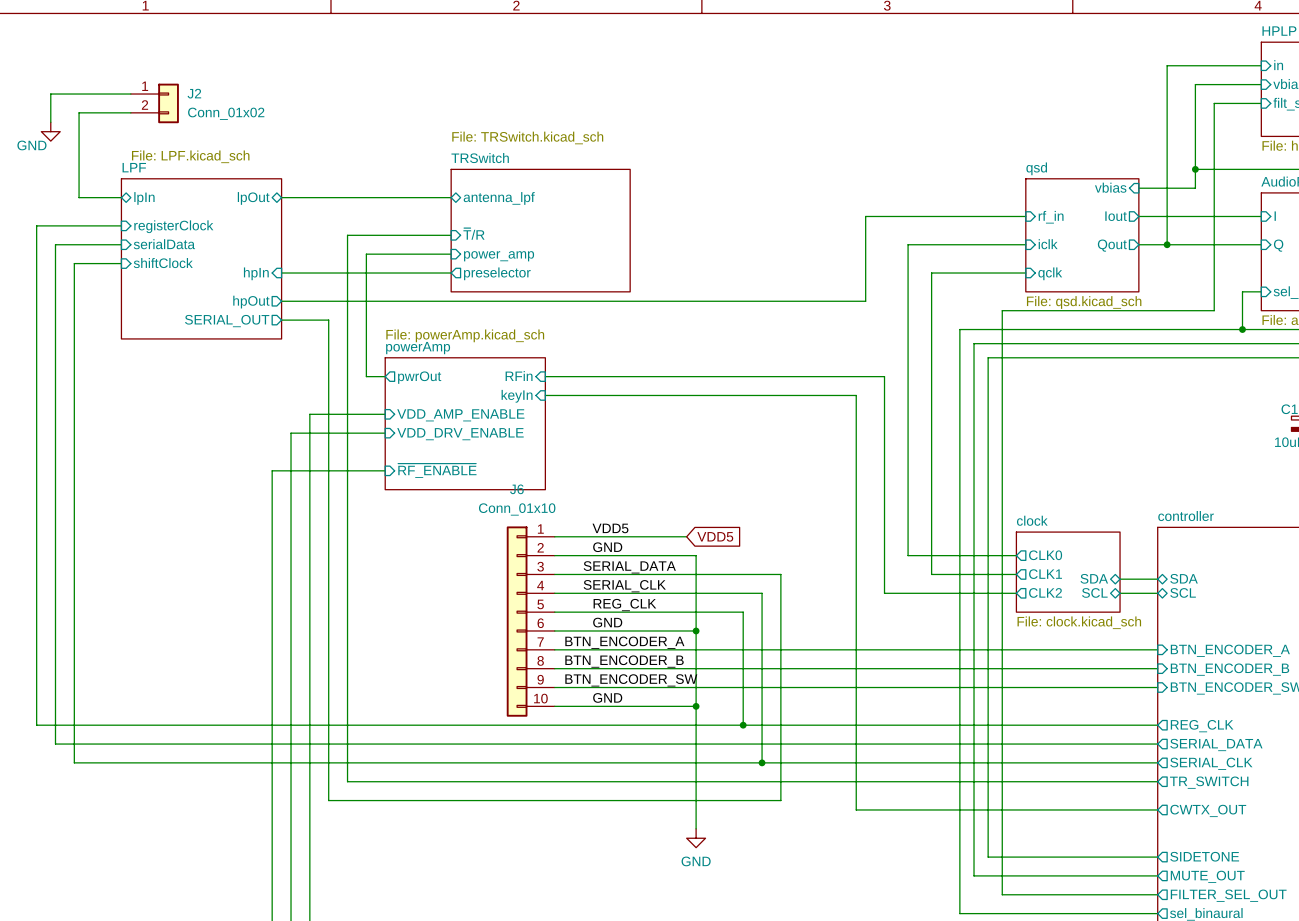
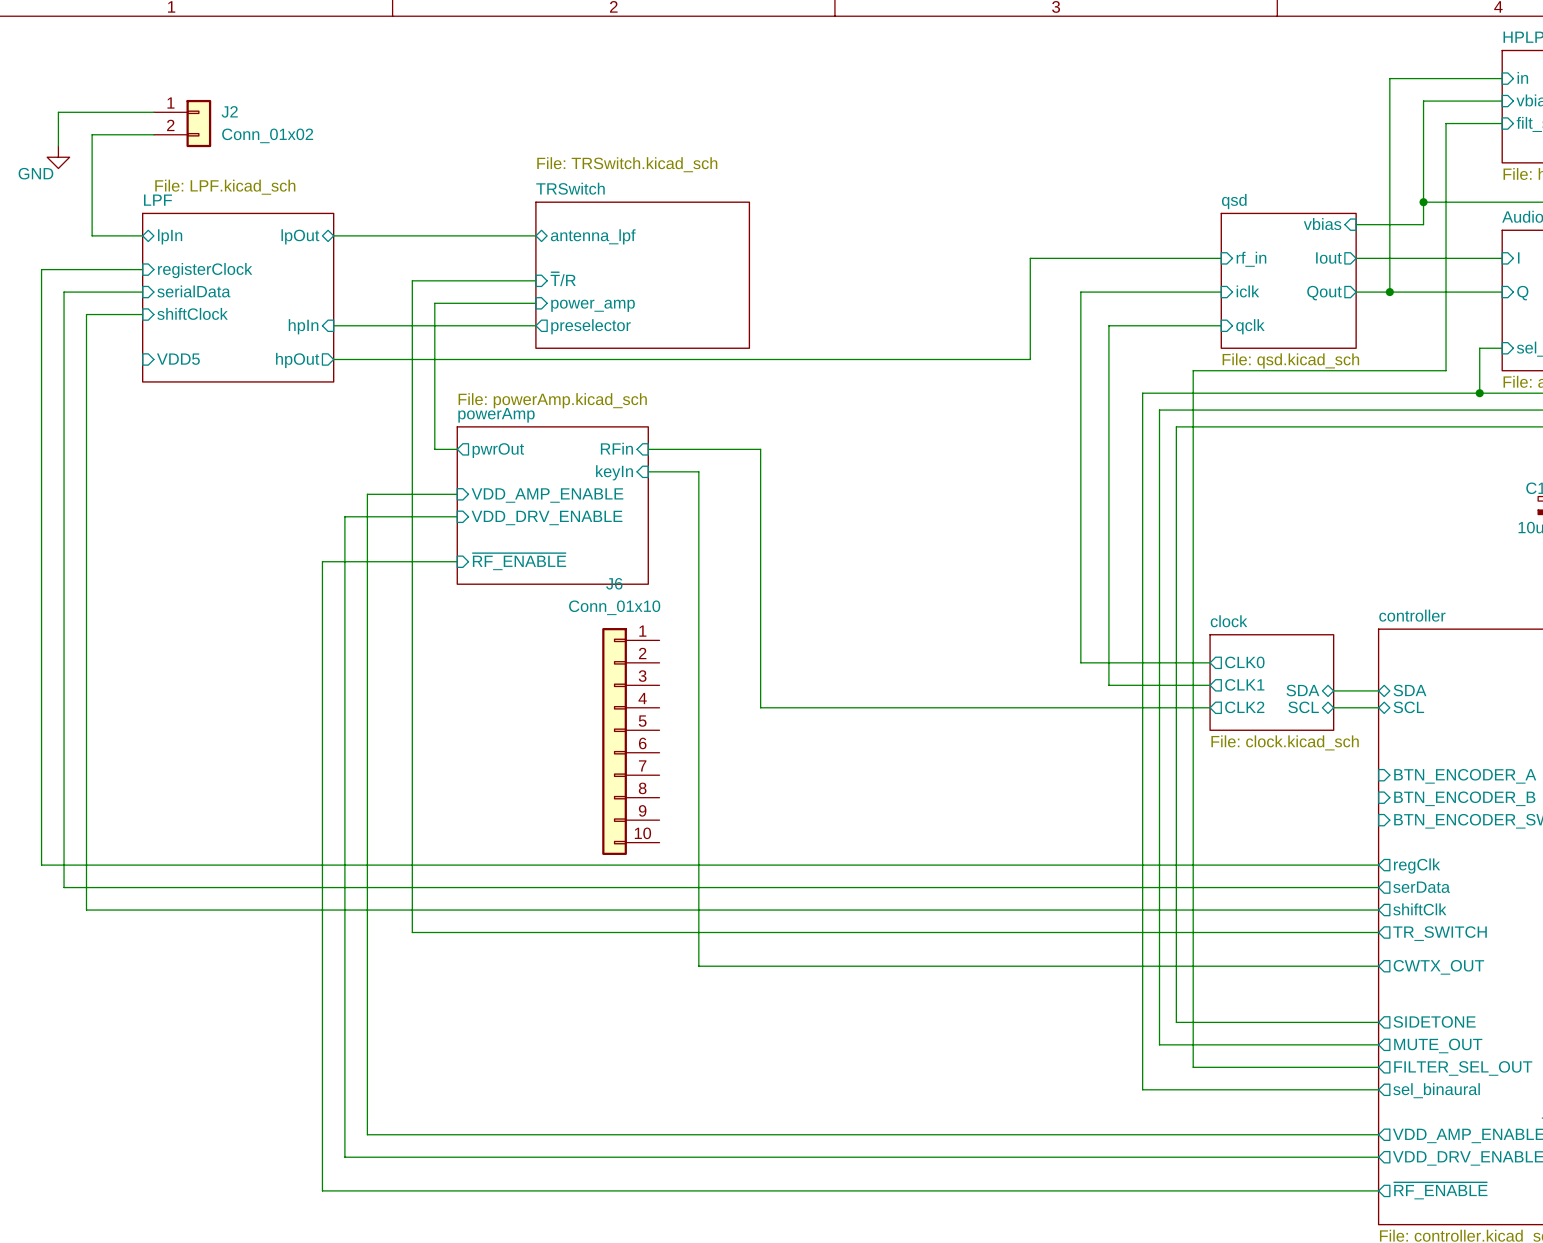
sheet LPF: none -> File: LPF.kicad_sch (238, 297)
sheet LPF: File: LPF.kicad_sch (201, 258) -> none
sheet pin: none -> VDD5 (178, 359)
wire: (281, 320) (328, 320) (328, 800) (780, 800) (780, 574) (554, 574) -> none
sheet pin: SERIAL_OUT (227, 321) -> none
wire: (639, 376) (884, 376) (884, 593) -> none
wire: (587, 395) (856, 395) (856, 809) -> (698, 471) (698, 966) (1019, 966)
label: VDD5 (610, 528) -> none
wire: (554, 536) (686, 536) -> none
global label: VDD5 (715, 536) -> none
label: GND (607, 547) -> none
wire: (554, 555) (696, 555) (696, 828) -> none
label: SERIAL_DATA (629, 567) -> none
label: SERIAL_CLK (624, 586) -> none
wire: (554, 593) (639, 593) -> (760, 449) (760, 707)
wire: (762, 593) (762, 762) -> (906, 707) (1052, 707)
label: REG_CLK (624, 605) -> none
wire: (554, 612) (743, 612) (743, 725) -> none
label: GND (607, 622) -> none
wire: (554, 630) (696, 630) -> none
junction: (696, 630) -> none
label: BTN_ENCODER_A (624, 642) -> none
wire: (554, 649) (1157, 649) -> none
label: BTN_ENCODER_B (624, 661) -> none
wire: (554, 668) (1157, 668) -> none
label: BTN_ENCODER_SW (631, 680) -> none
wire: (554, 687) (1157, 687) -> none
label: GND (607, 697) -> none
wire: (554, 706) (696, 706) -> none
junction: (696, 706) -> none
junction: (743, 725) -> none
sheet pin: REG_CLK (1202, 726) -> regClk (1417, 866)
sheet pin: SERIAL_DATA (1216, 744) -> serData (1421, 887)
junction: (762, 762) -> none
sheet pin: SERIAL_CLK (1211, 763) -> shiftClk (1419, 909)
power symbol: GND (696, 838) -> none

